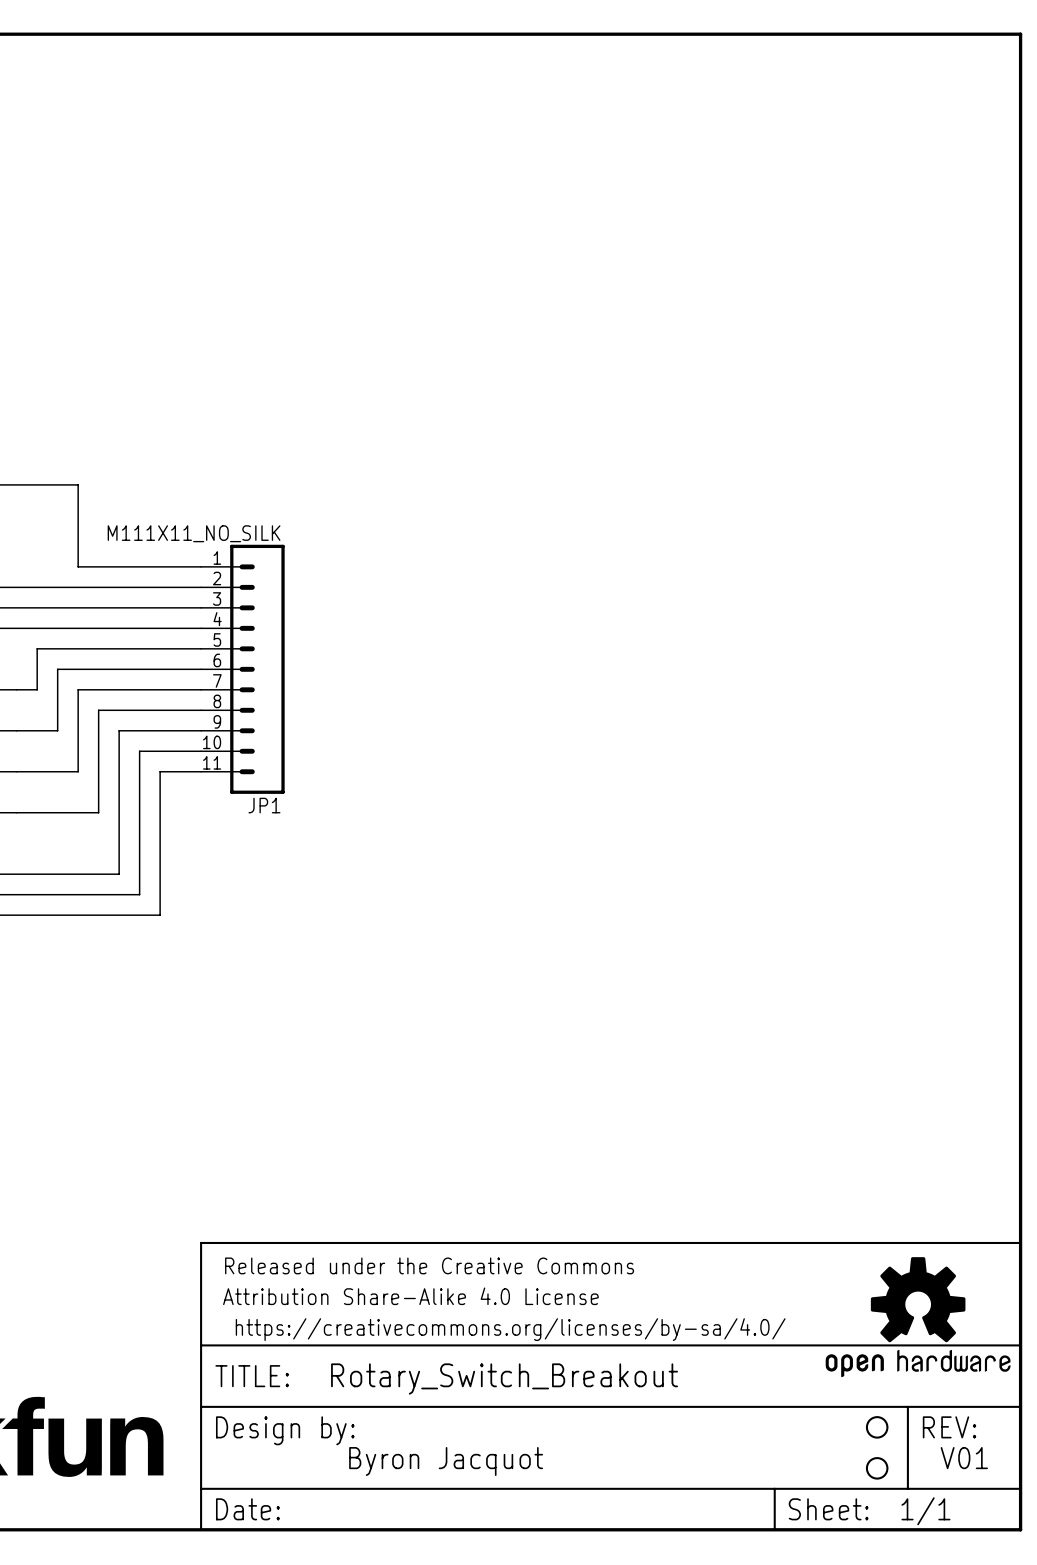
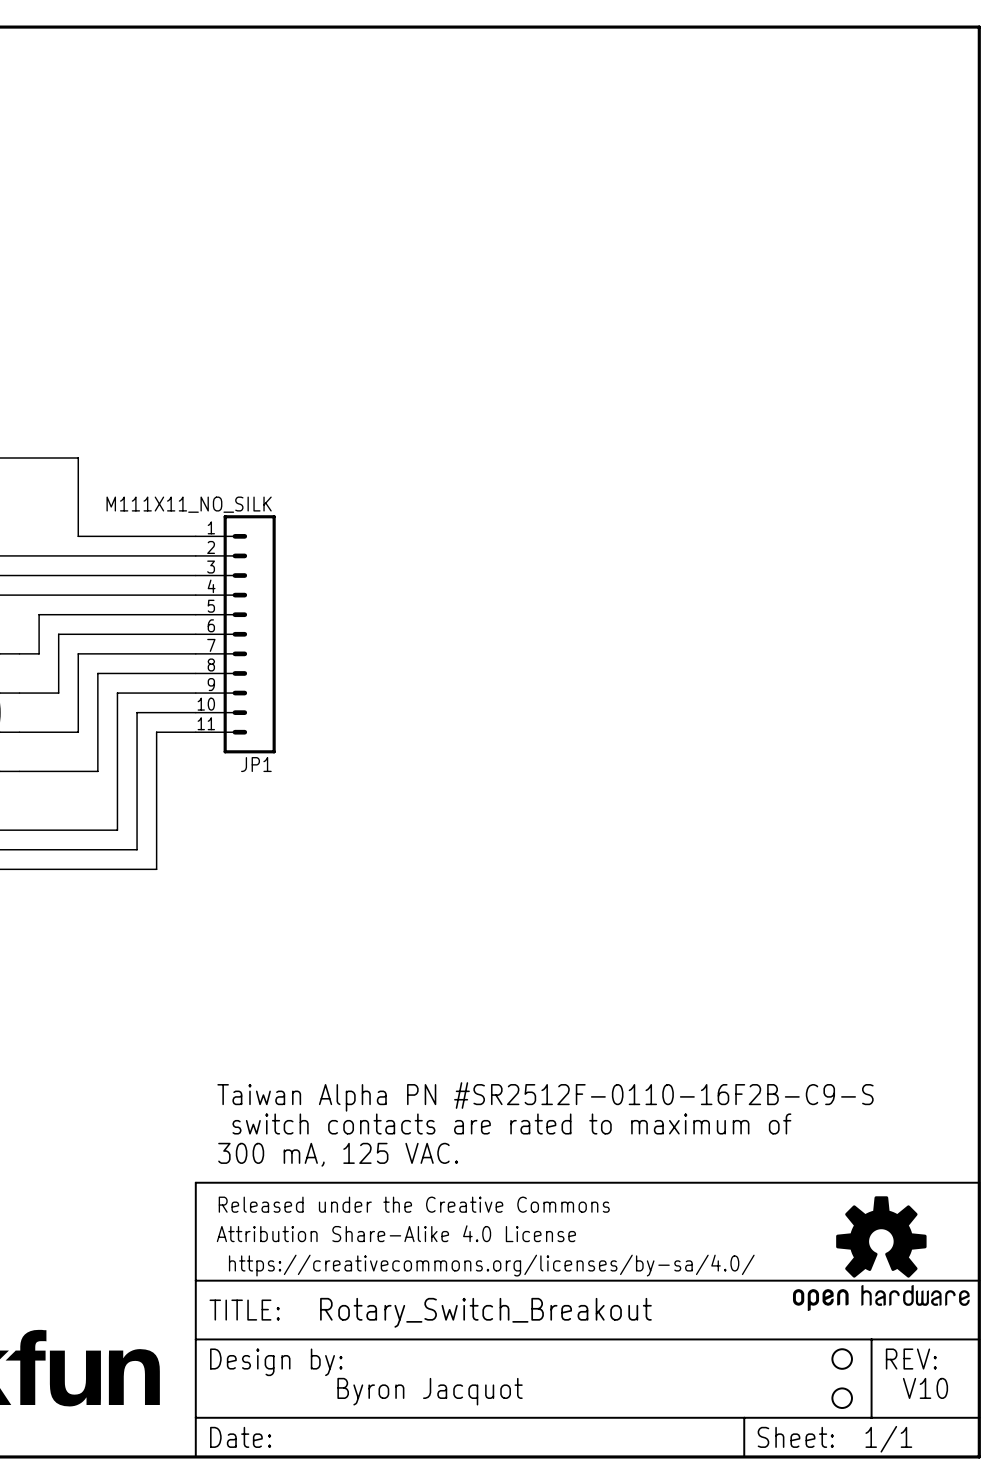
text: none -> Taiwan Alpha PN #SR2512F-0110-16F2B-C9-S (545, 1096)
text: none -> switch contacts are rated to maximum of (511, 1123)
text: none -> 300 mA, 125 VAC. (338, 1154)
text: V01 (964, 1458) -> V10 (925, 1388)

